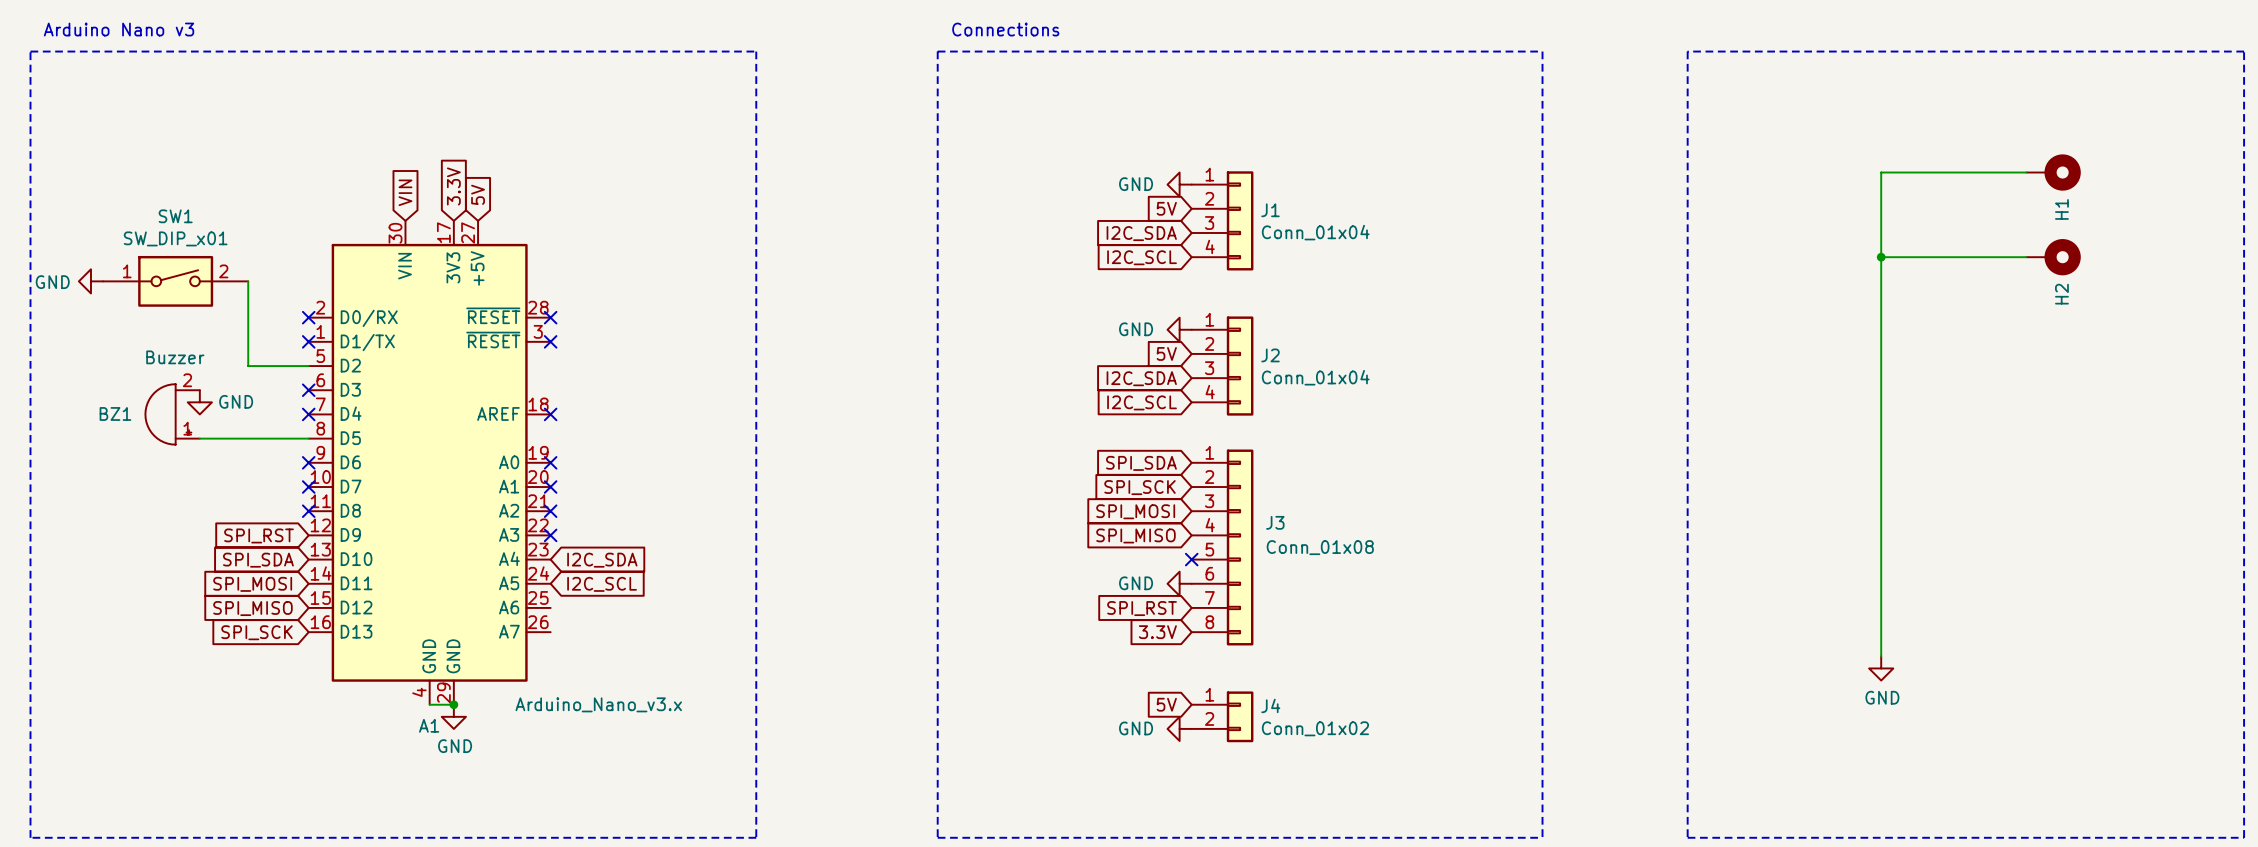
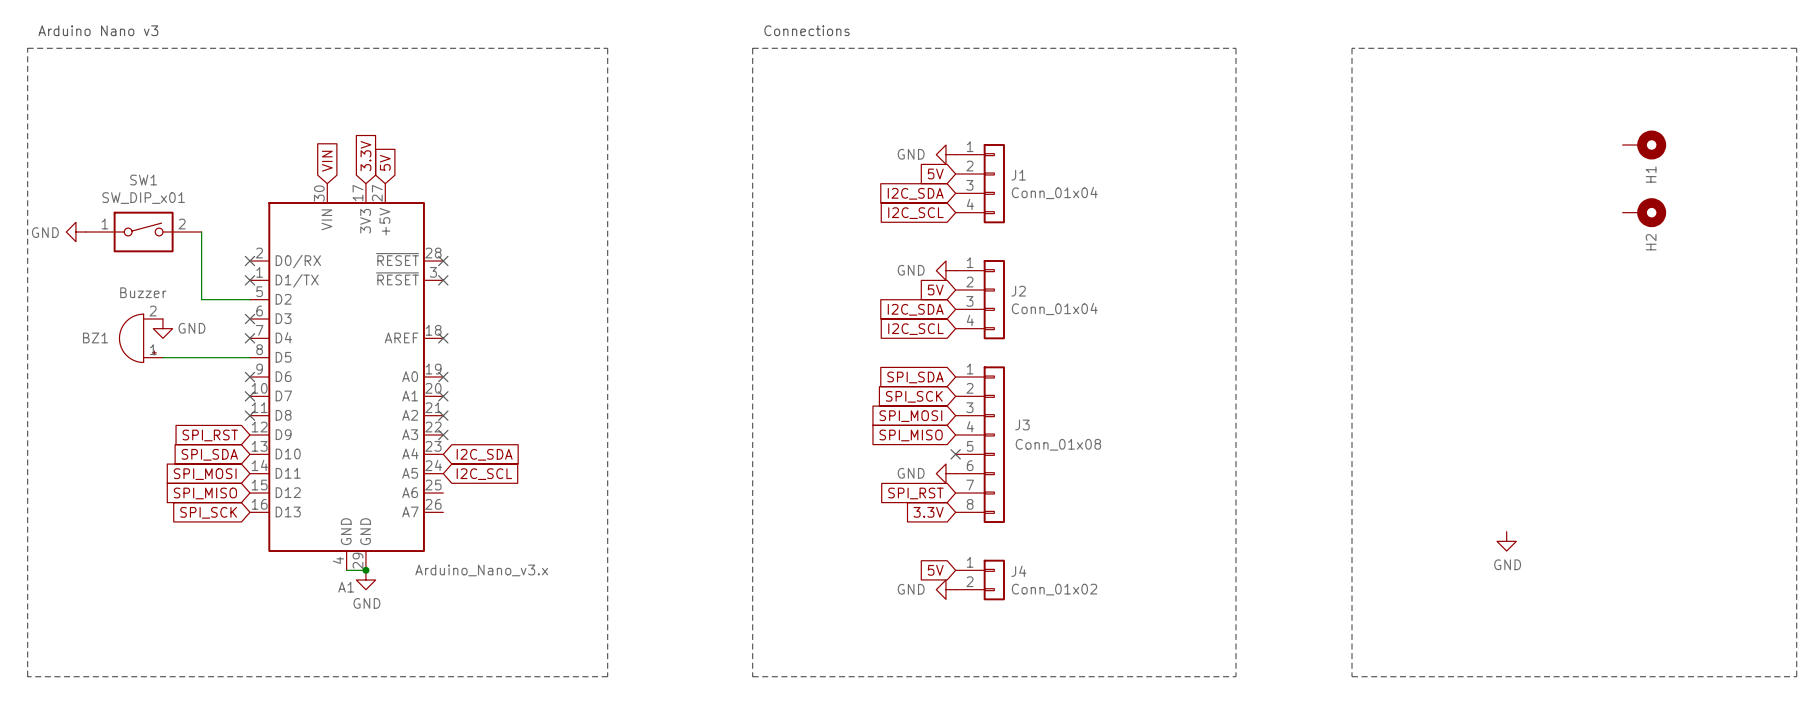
wire: (2026, 172) (1881, 172) (1881, 656) -> none
wire: (1881, 257) (2026, 257) -> none
junction: (1881, 257) -> none

